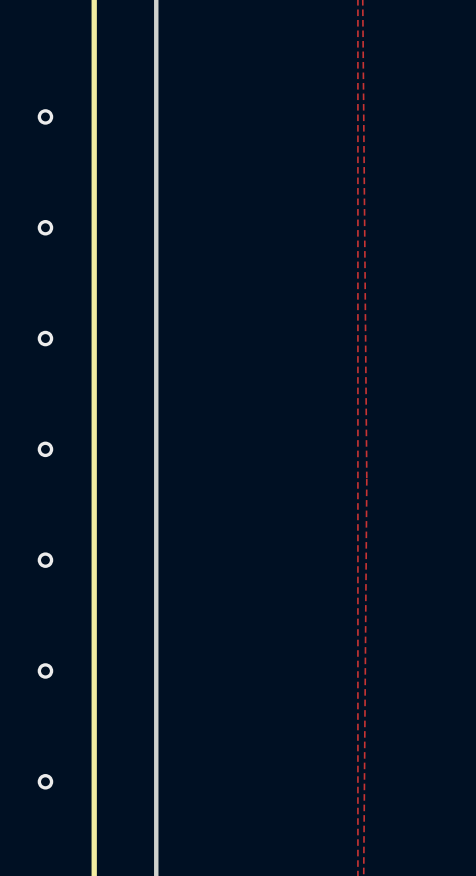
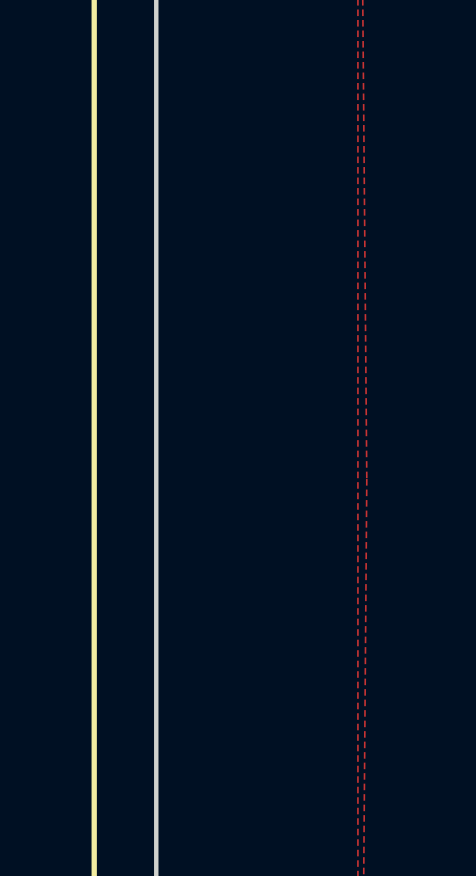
via: (45, 116) -> none
via: (45, 227) -> none
via: (45, 338) -> none
via: (45, 449) -> none
via: (45, 560) -> none
via: (45, 670) -> none
via: (45, 781) -> none

